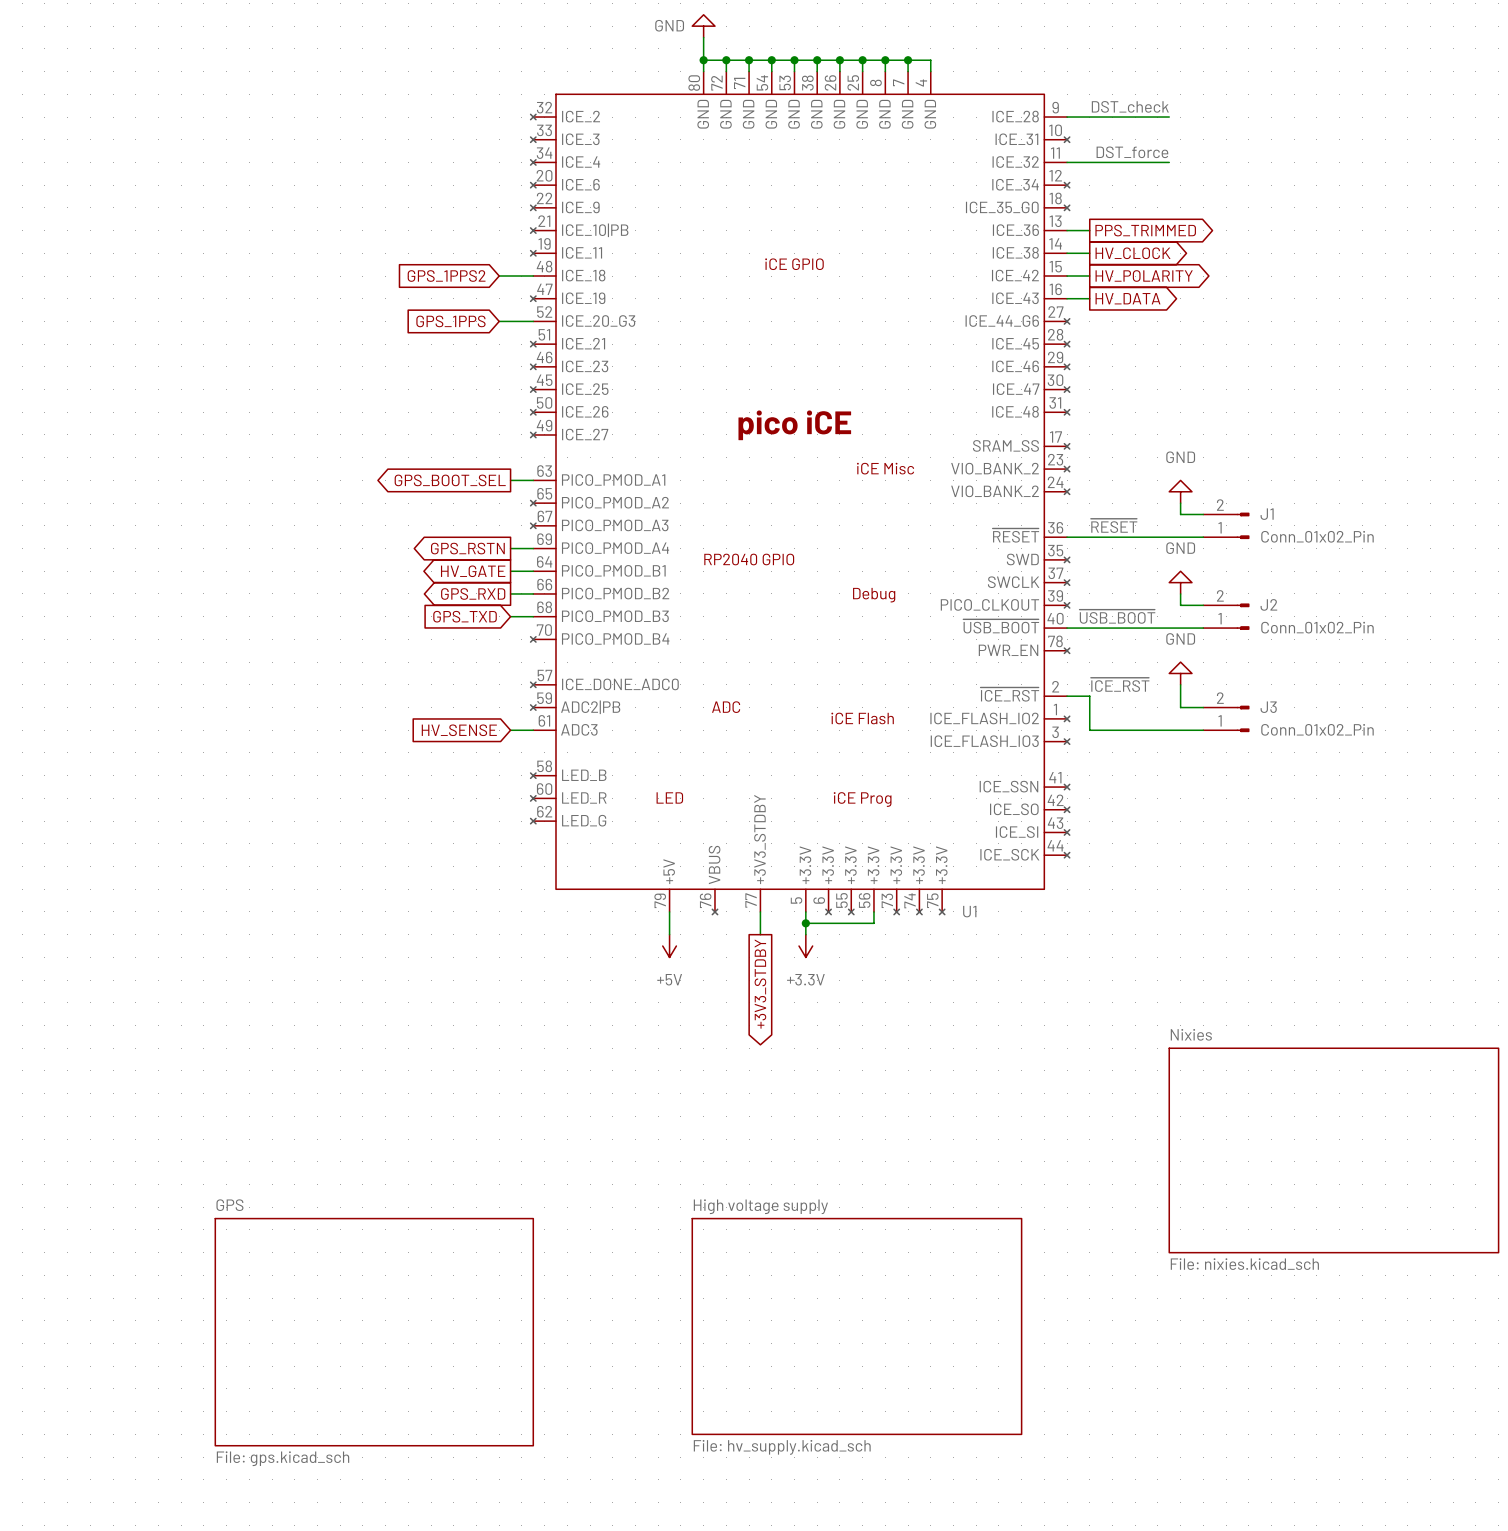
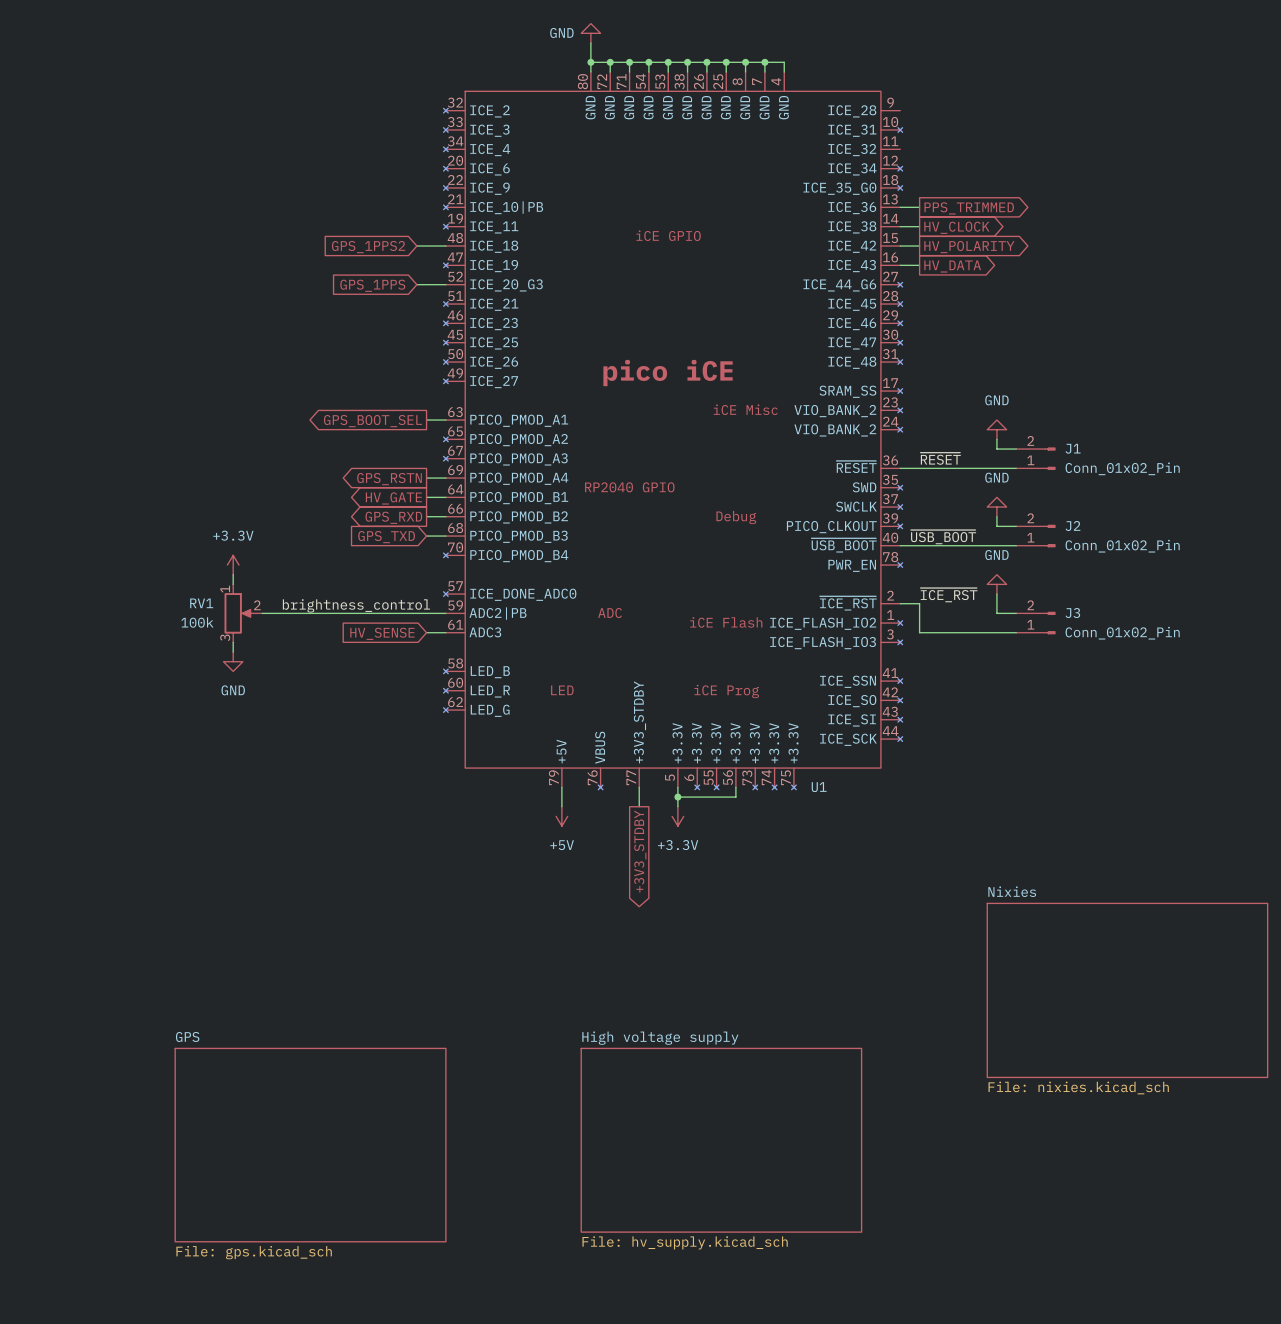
U1 symbol: [530, 71, 1070, 915] -> [443, 71, 903, 790]
label: DST_check (1130, 106) -> none
wire: (1067, 117) (1169, 117) -> none
label: DST_force (1132, 152) -> none
wire: (1067, 162) (1169, 162) -> none
power symbol: none -> +3.3V (233, 565)
wire: none -> (233, 574) (233, 584)
label: none -> brightness_control (356, 605)
RV1: none -> 100k (243, 613)
wire: none -> (262, 613) (445, 613)
wire: none -> (233, 642) (233, 652)
power symbol: none -> GND (233, 661)

